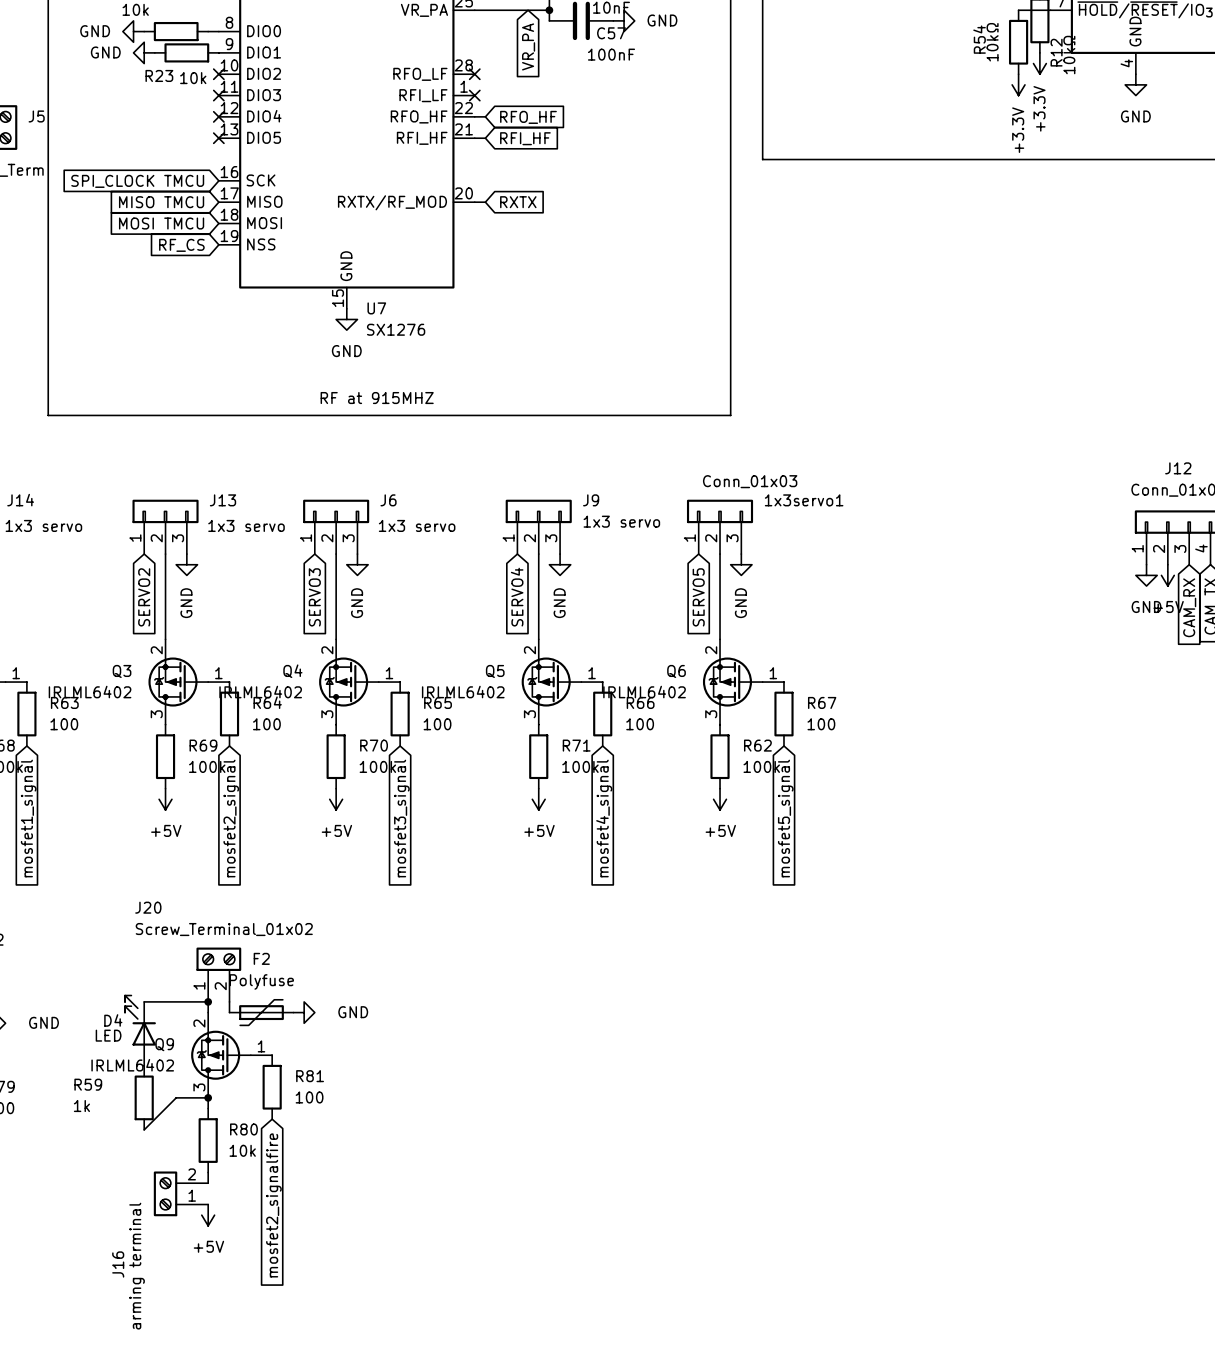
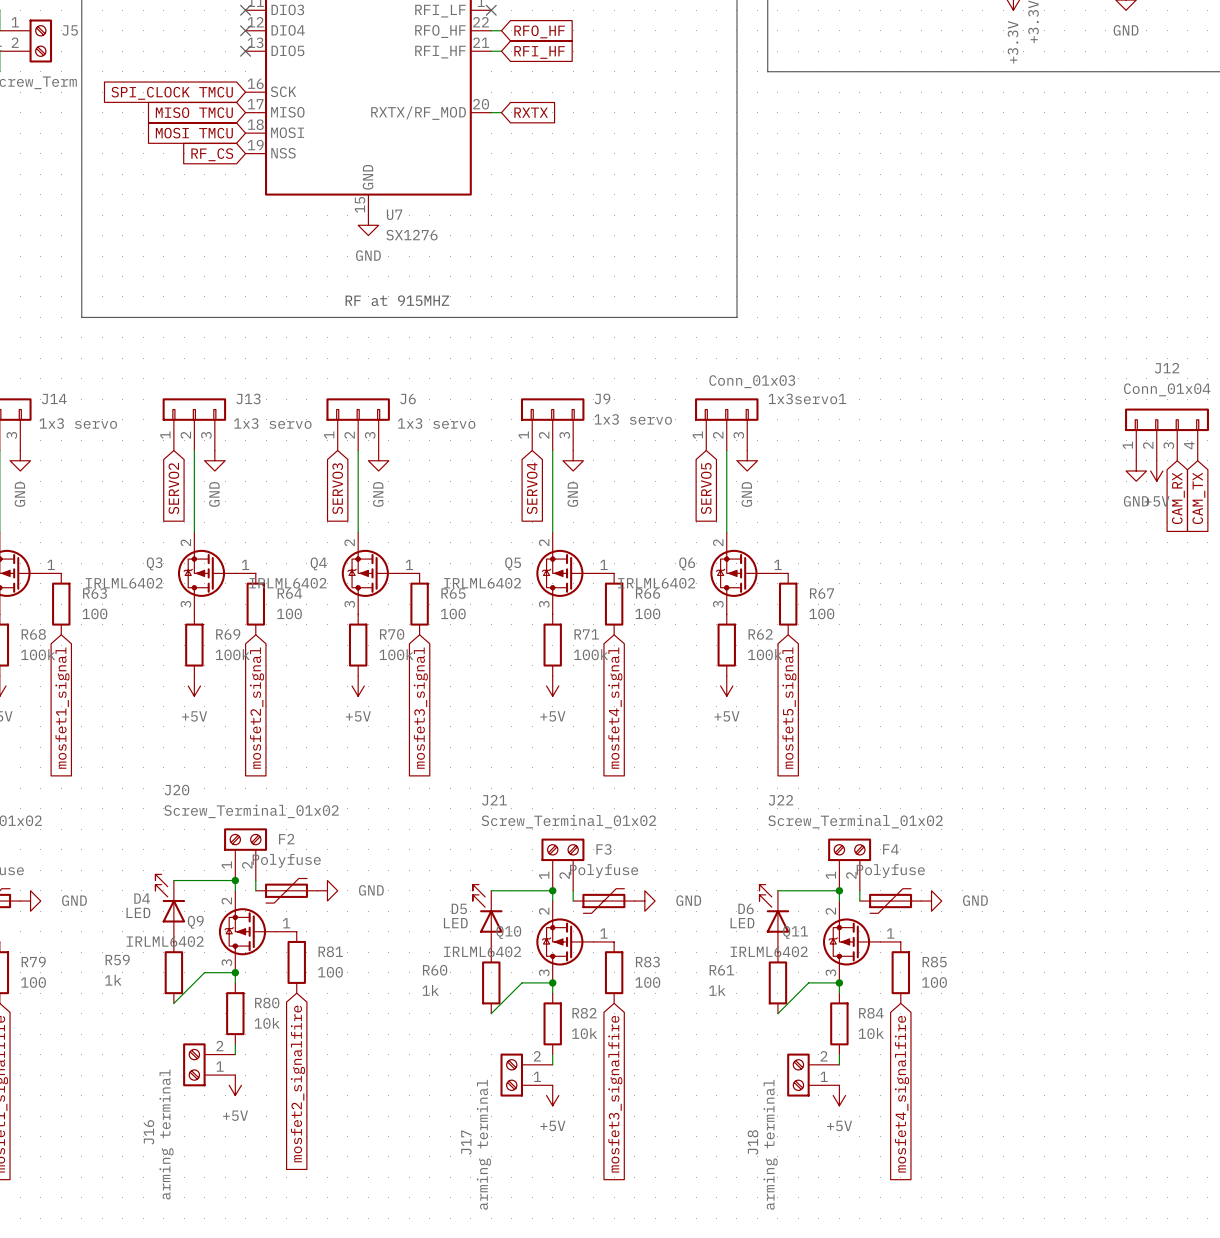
J21: none -> Screw_Terminal_01x02 (562, 864)
J22: none -> Screw_Terminal_01x02 (849, 864)
wire: none -> (491, 890) (552, 890) (552, 901)
junction: none -> (552, 890)
wire: none -> (573, 890) (573, 901)
wire: none -> (777, 890) (839, 890) (839, 901)
junction: none -> (839, 890)
wire: none -> (859, 890) (859, 901)
F3: none -> Polyfuse (603, 901)
power symbol: none -> GND (644, 901)
F4: none -> Polyfuse (890, 901)
power symbol: none -> GND (931, 901)
D5: none -> LED (487, 918)
D6: none -> LED (774, 918)
Q10: none -> IRLML6402 (575, 941)
Q11: none -> IRLML6402 (861, 941)
R83: none -> 100 (614, 972)
R85: none -> 100 (900, 972)
R60: none -> 1k (491, 982)
junction: none -> (552, 982)
R61: none -> 1k (777, 982)
junction: none -> (839, 982)
wire: none -> (552, 993) (552, 982) (521, 982) (491, 1013)
wire: none -> (839, 993) (839, 982) (808, 982) (777, 1013)
R82: none -> 10k (552, 1023)
R84: none -> 10k (839, 1023)
wire: none -> (552, 1054) (552, 1064)
wire: none -> (839, 1054) (839, 1064)
J17: none -> arming terminal (526, 1075)
J18: none -> arming terminal (813, 1075)
global label: none -> mosfet3_signalfire (615, 1094)
global label: none -> mosfet4_signalfire (901, 1094)
power symbol: none -> +5V (552, 1095)
power symbol: none -> +5V (839, 1095)

